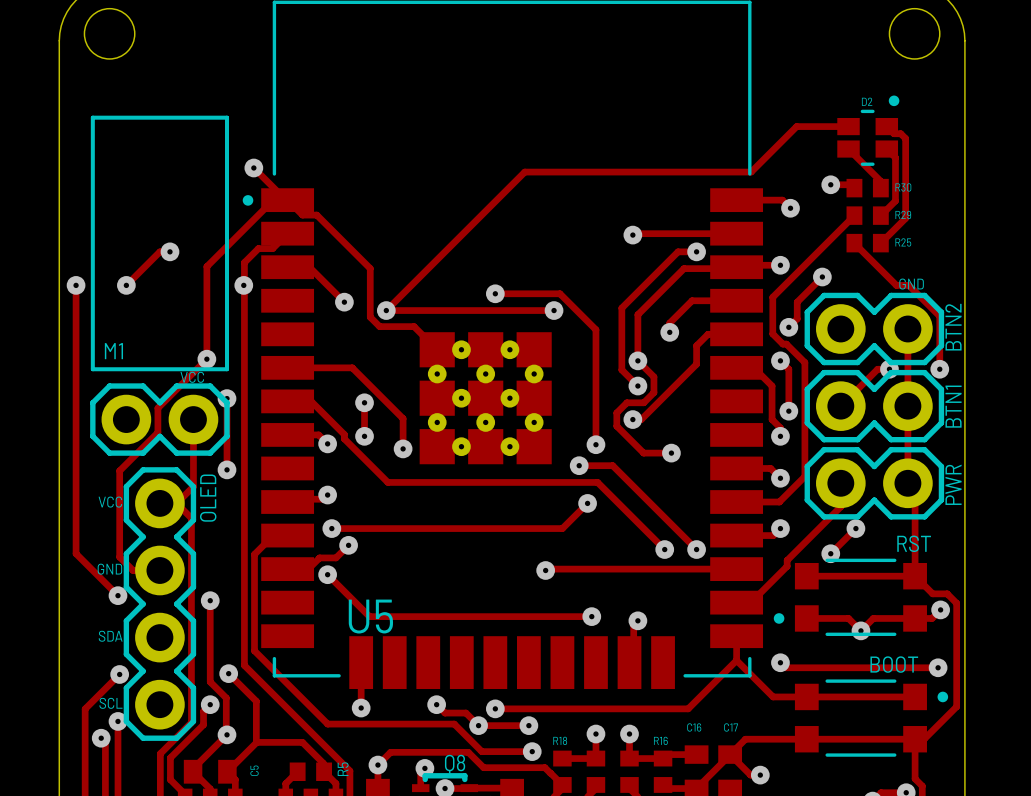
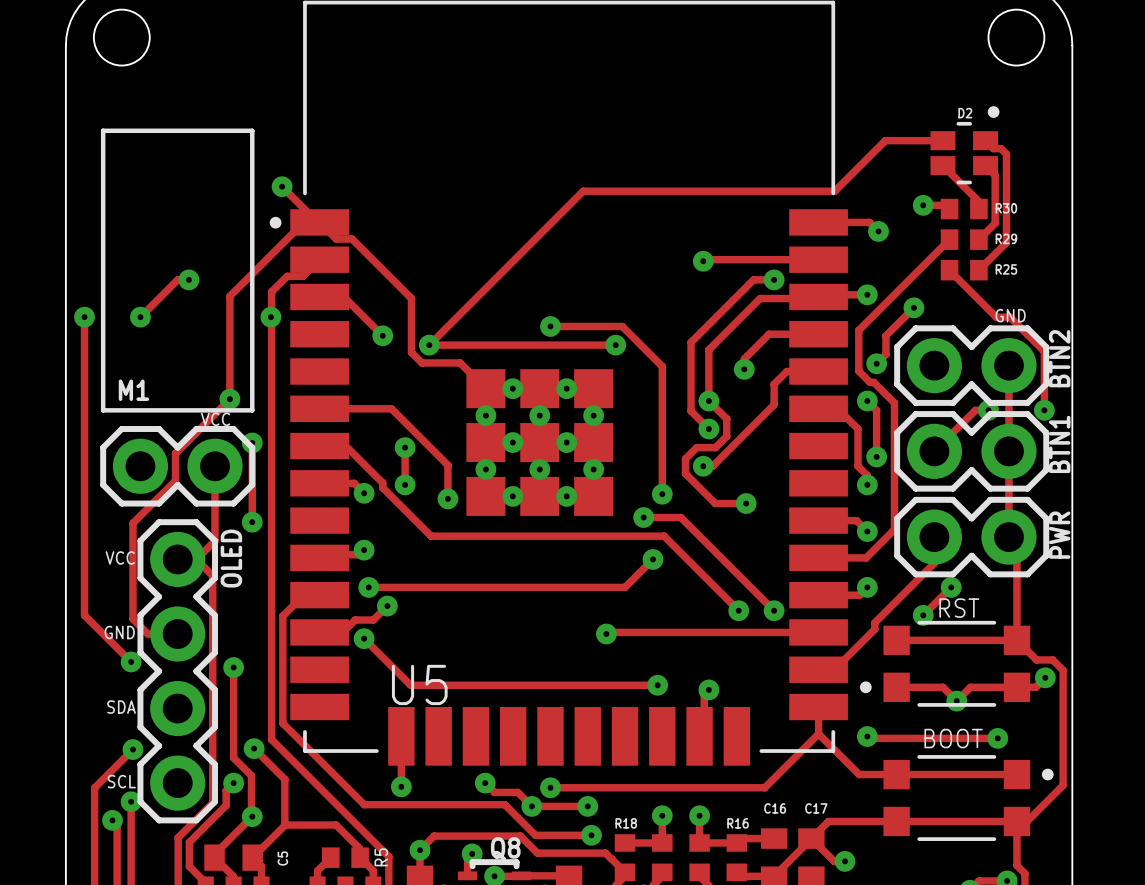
RST name position: RST (914, 543) -> RST (959, 608)
track: (782, 664) (785, 667) (938, 667) -> (869, 738) (997, 738)
BOOT name position: BOOT (894, 664) -> BOOT (953, 738)
via position: (938, 667) -> (997, 738)

